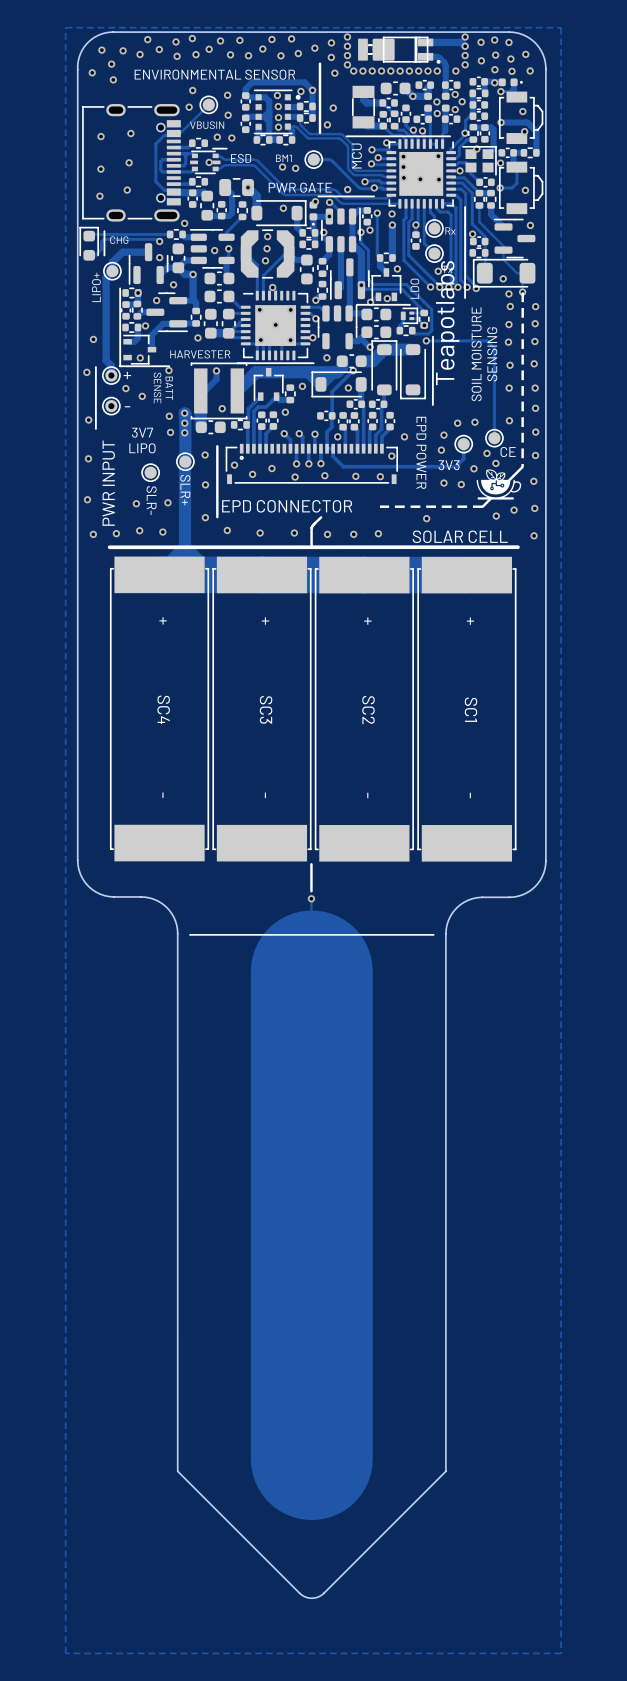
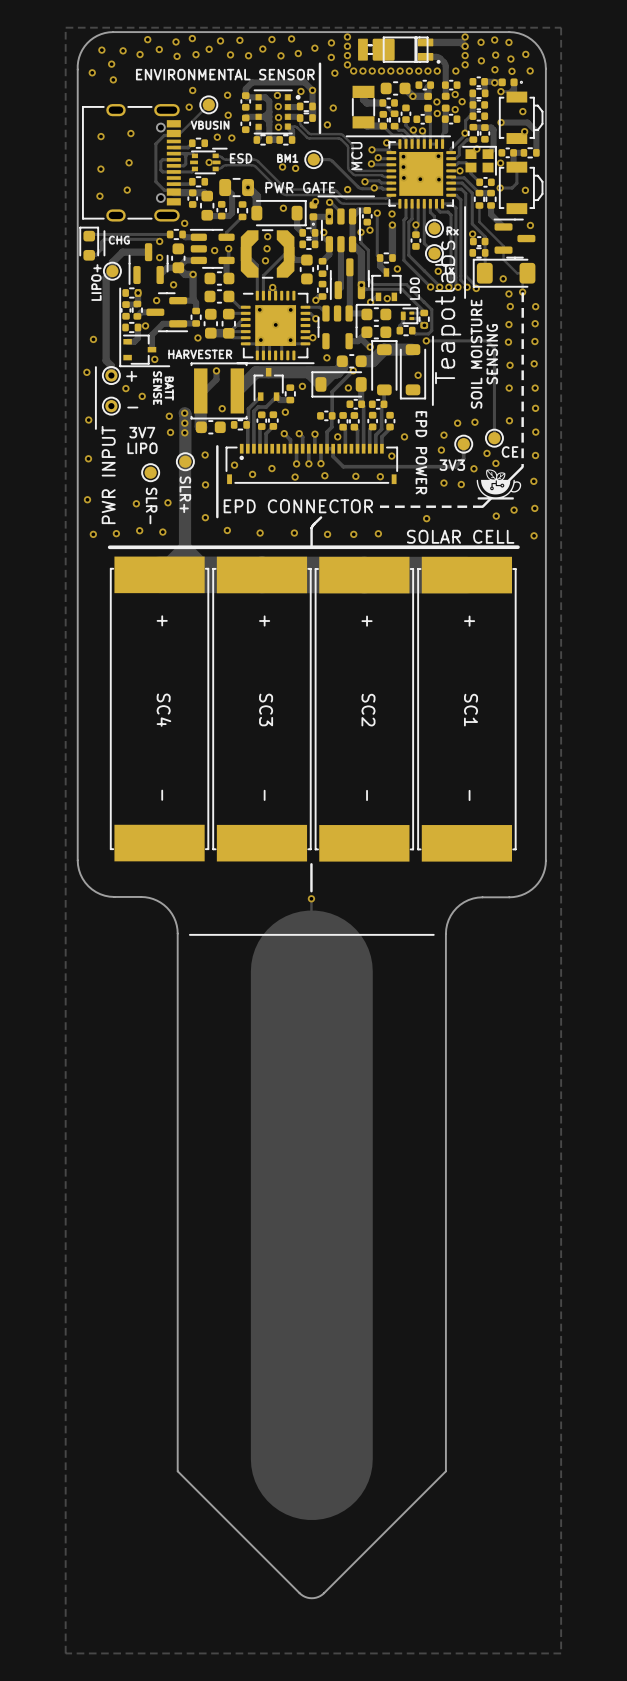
via: (140, 357) -> none
via: none -> (154, 359)
via: (168, 370) -> none
via: none -> (418, 375)

